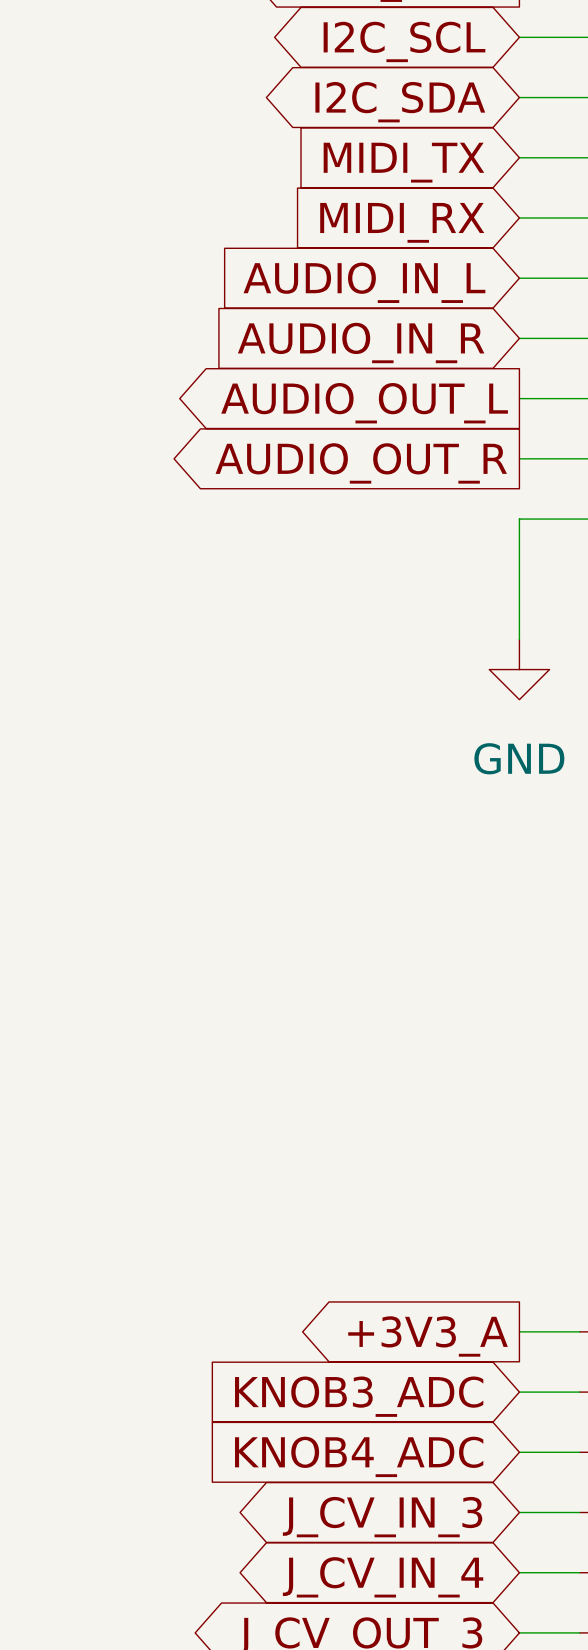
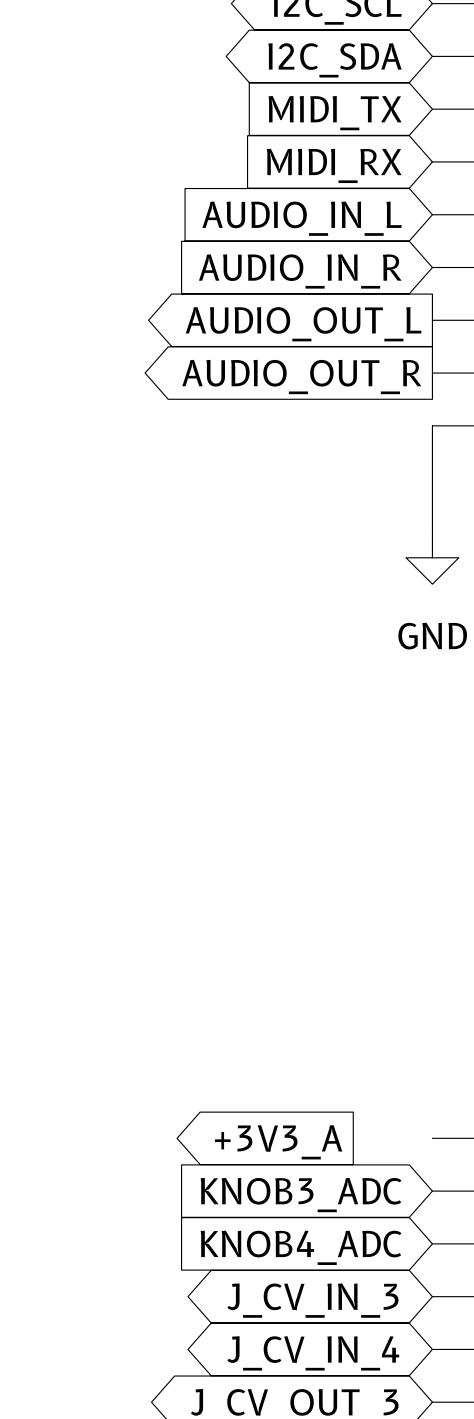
global label position: +3V3_A (428, 1336) -> +3V3_A (278, 1142)

